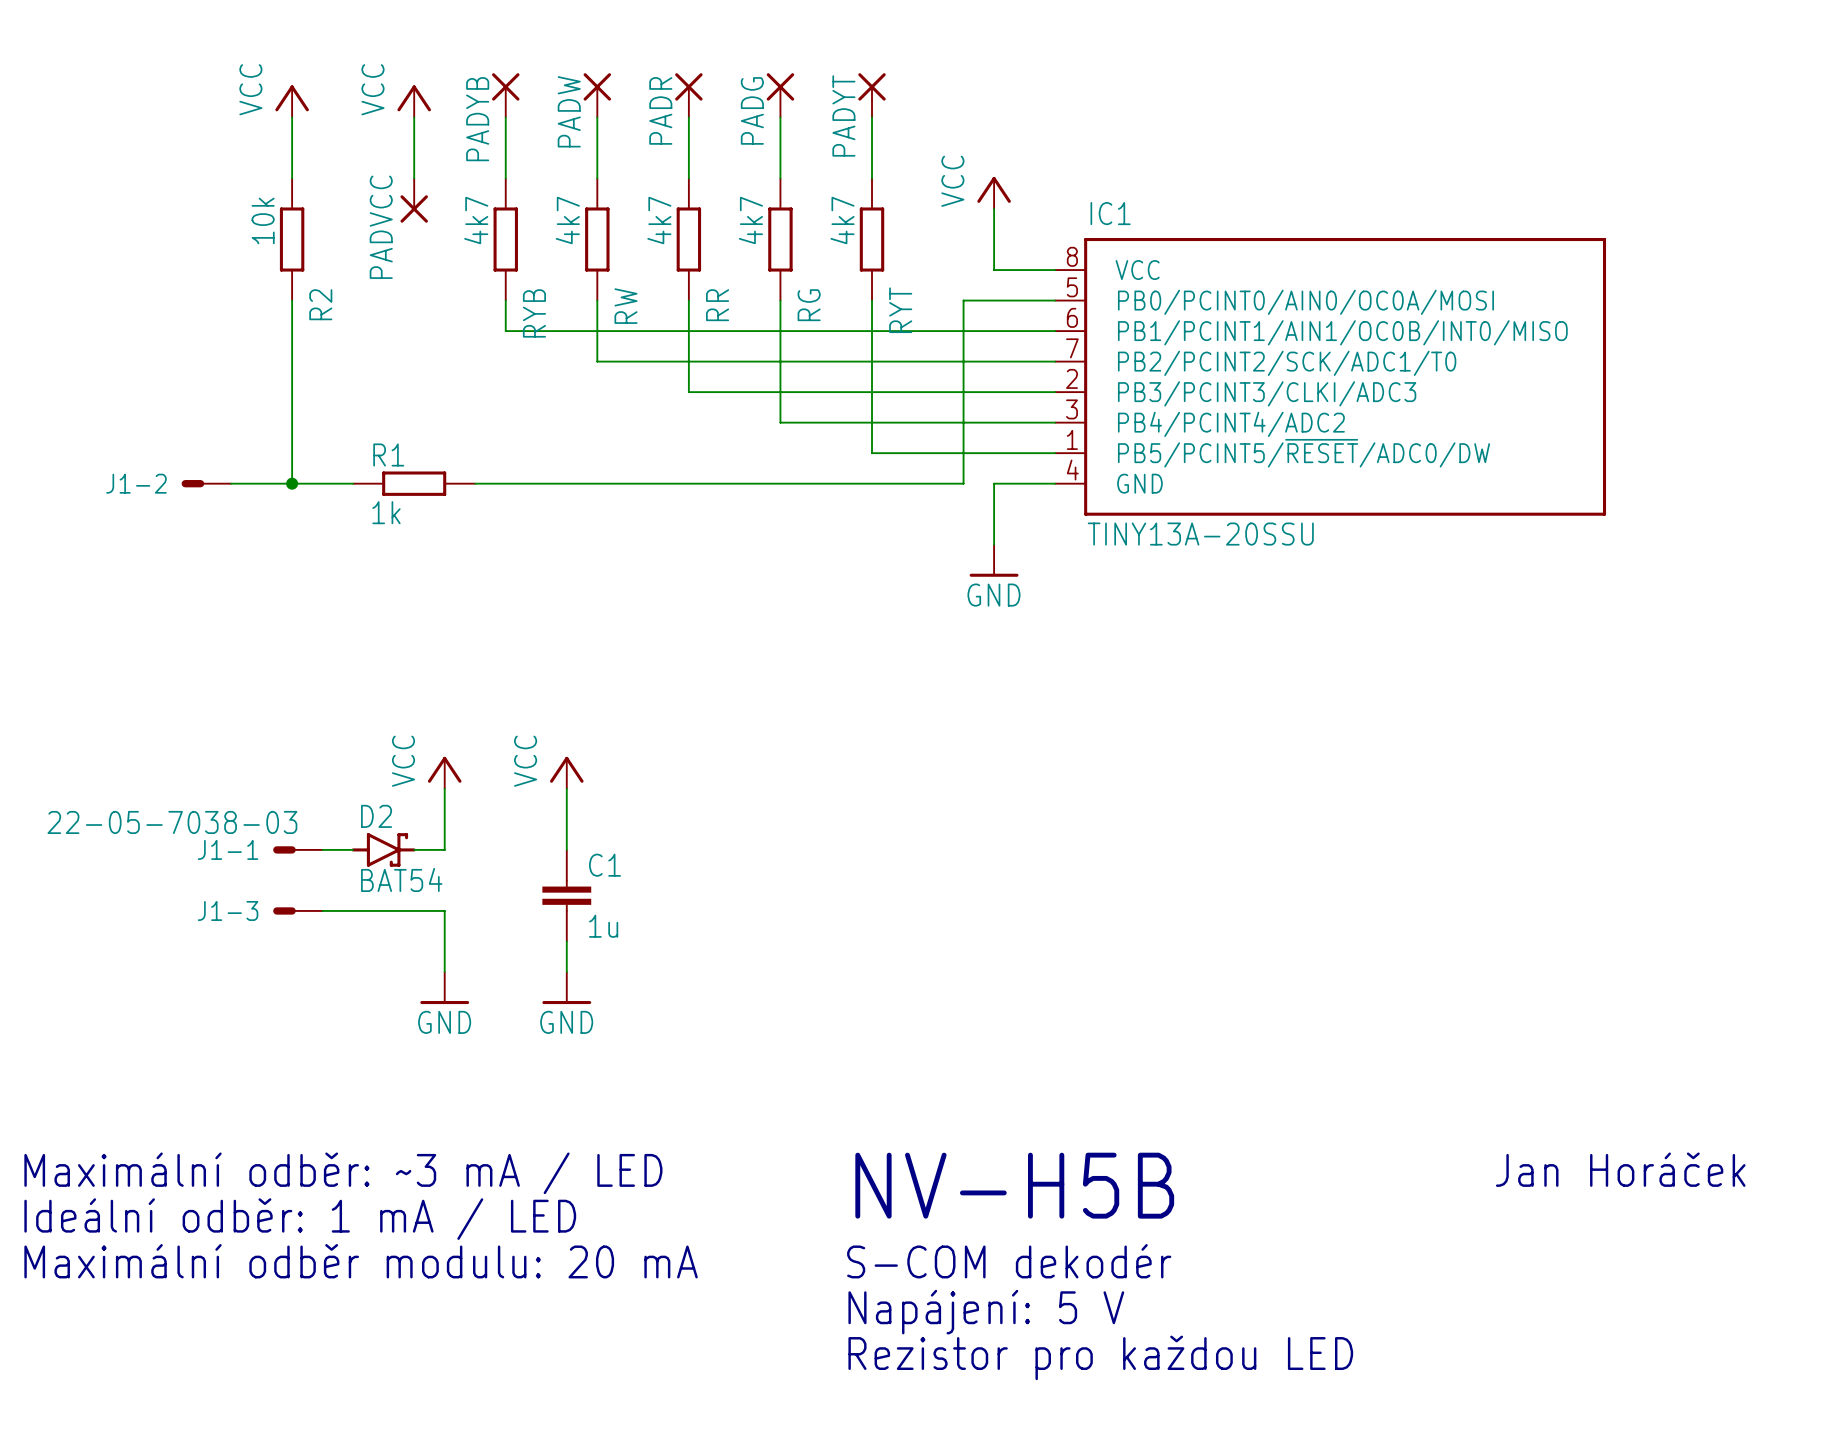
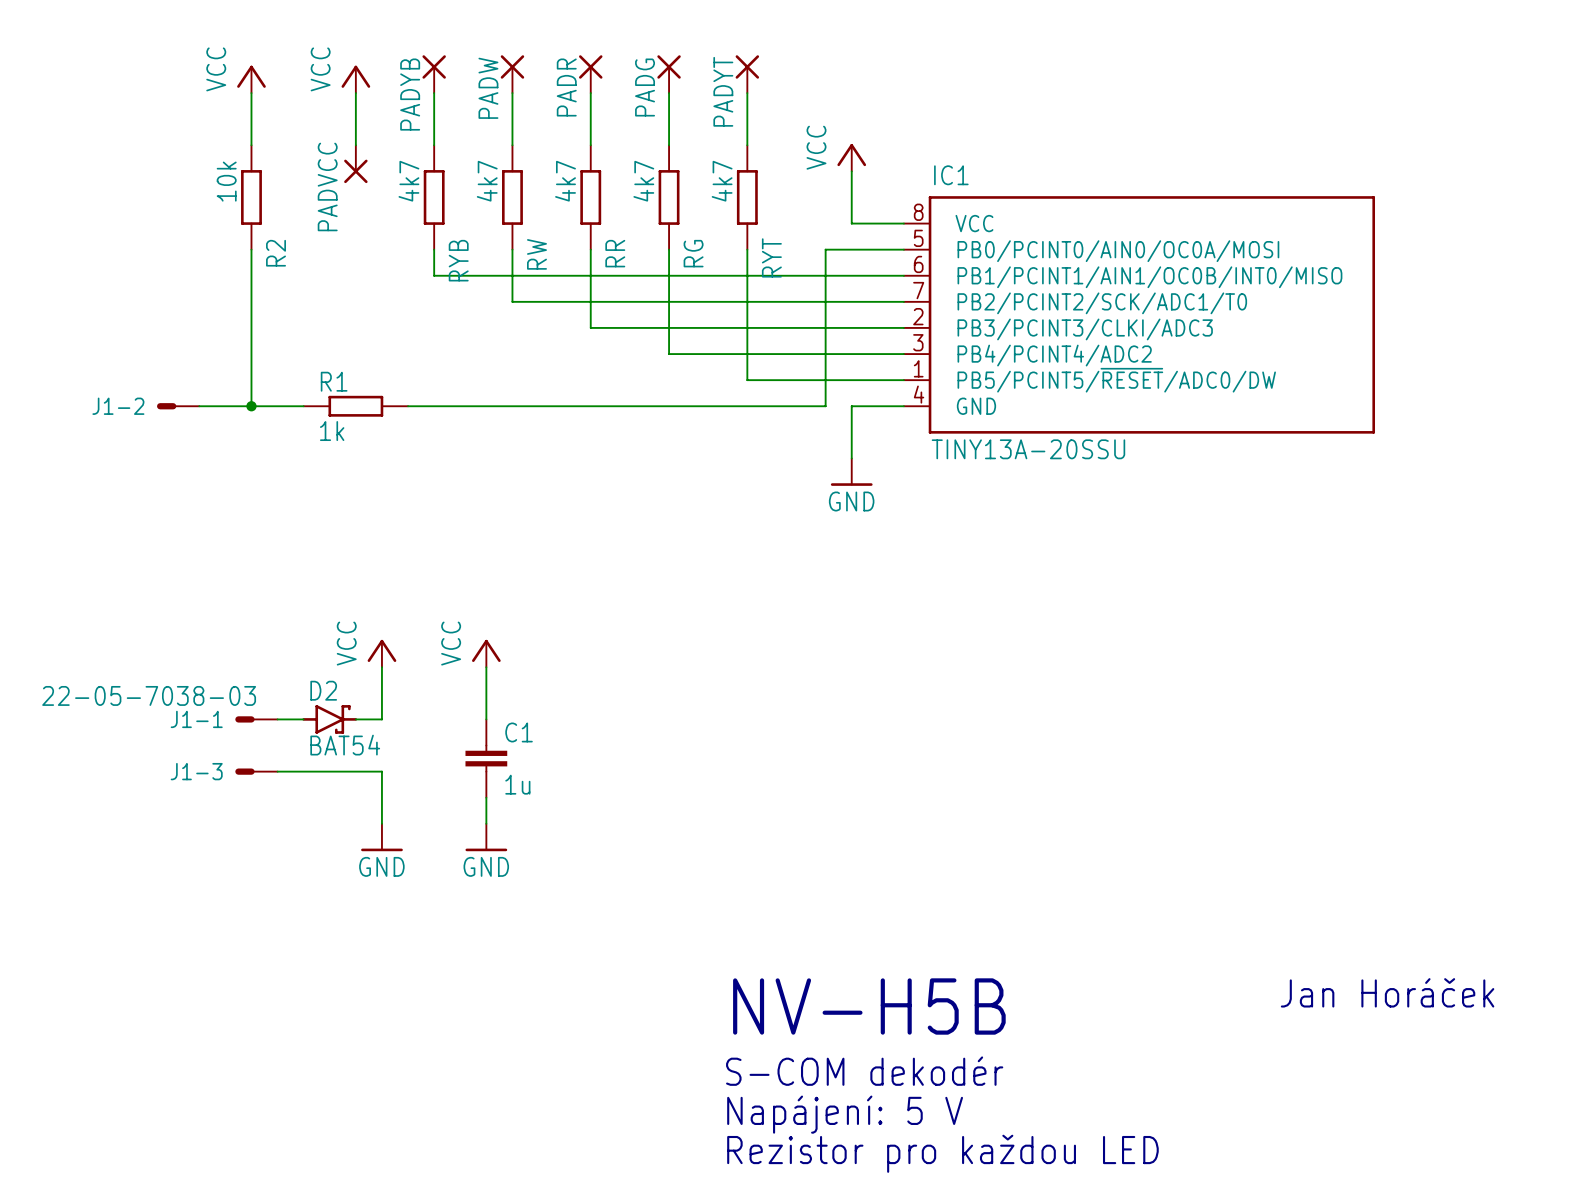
text: Maximální odběr: ~3 mA / LED (343, 1173) -> none
text: Ideální odběr: 1 mA / LED (300, 1219) -> none
text: Maximální odběr modulu: 20 mA (361, 1261) -> none

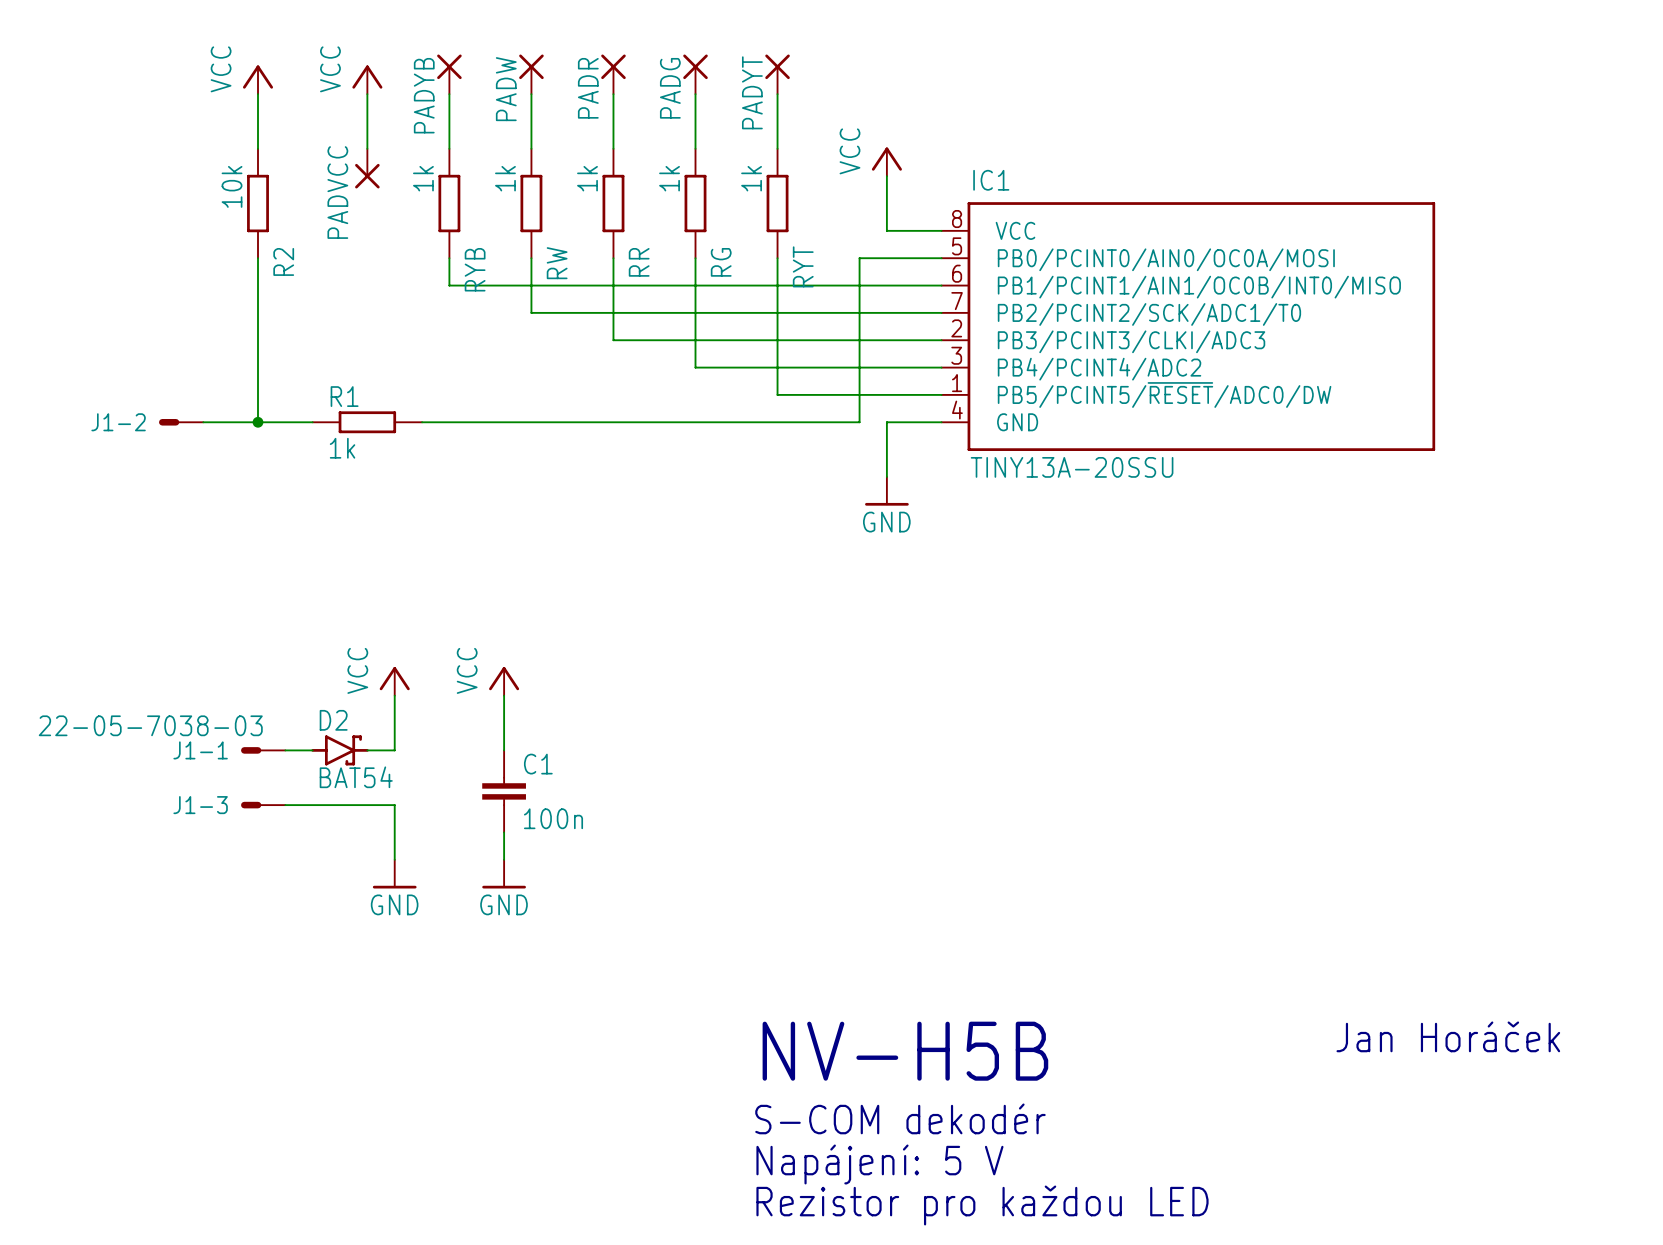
RYB value: 4k7 (408, 181) -> 1k (423, 178)
RW value: 4k7 (487, 181) -> 1k (505, 178)
RR value: 4k7 (565, 181) -> 1k (587, 178)
RG value: 4k7 (643, 181) -> 1k (669, 178)
RYT value: 4k7 (722, 181) -> 1k (751, 178)
C1 value: 1u (517, 784) -> 100n (553, 818)

